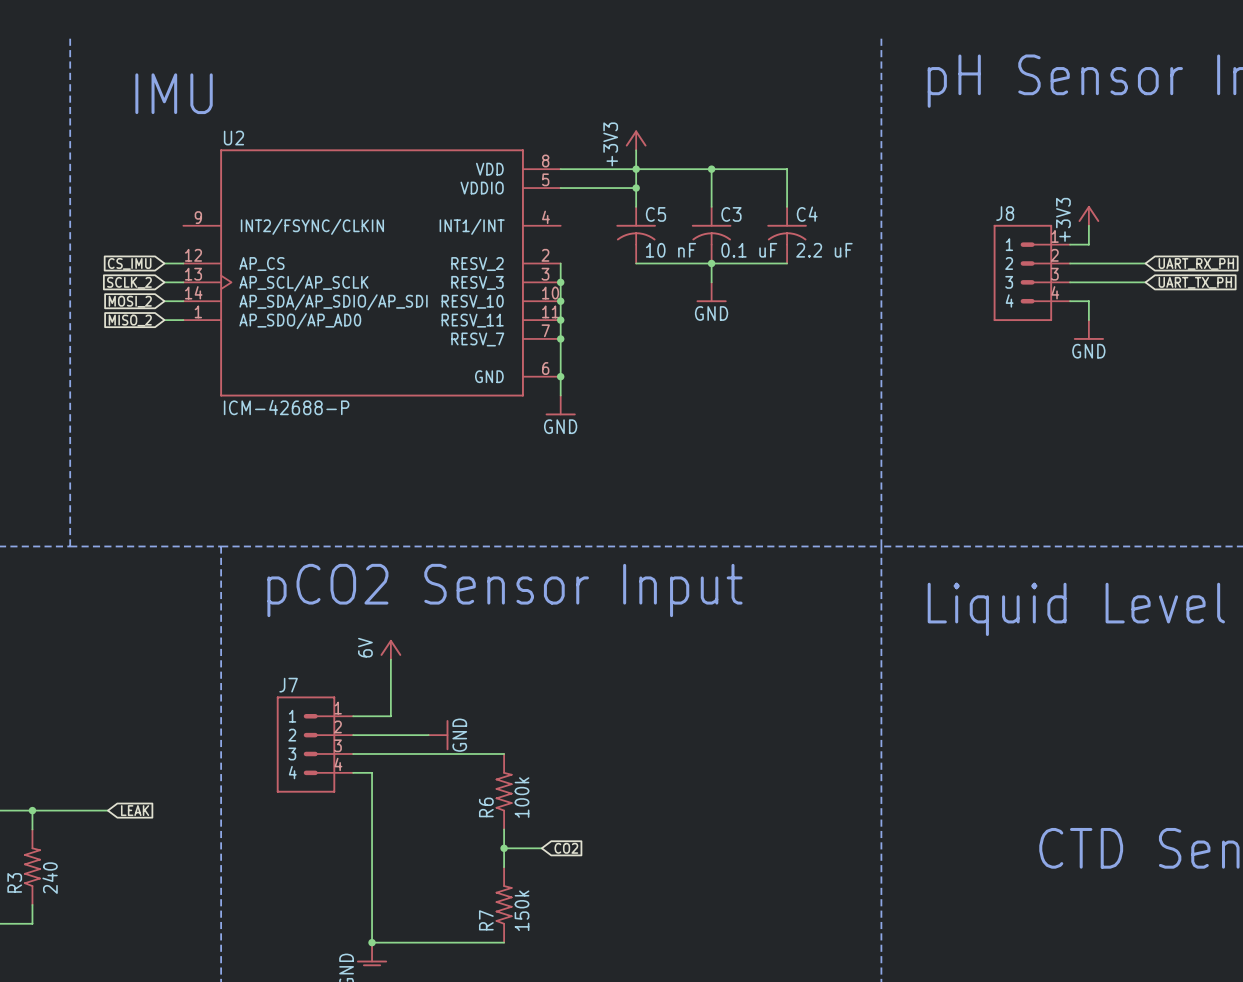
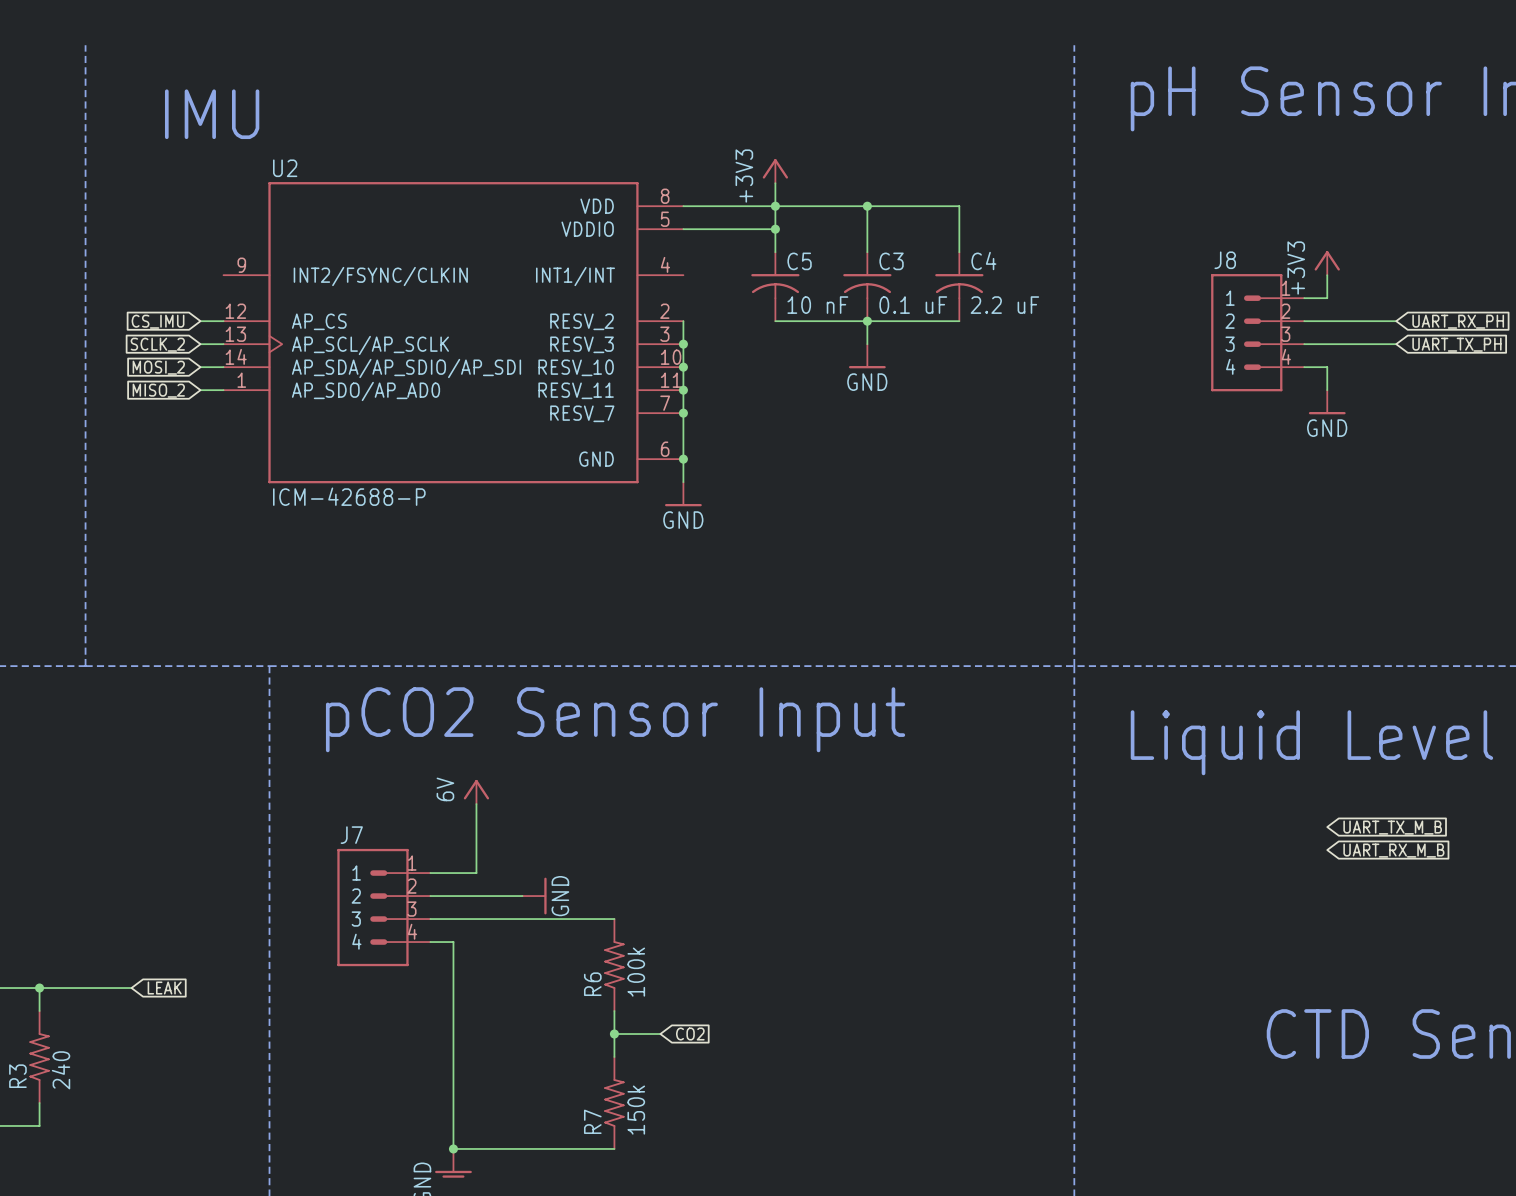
global label: none -> UART_TX_M_B (1392, 827)
global label: none -> UART_RX_M_B (1393, 850)

